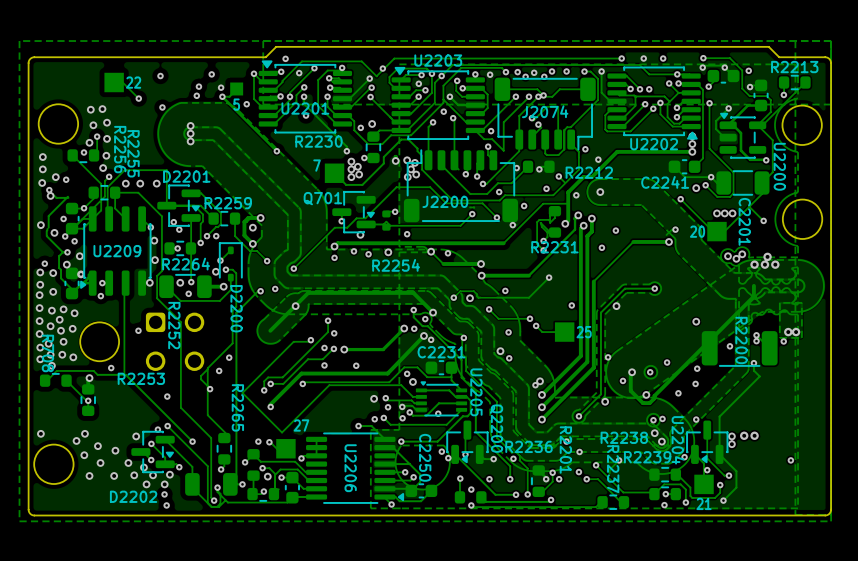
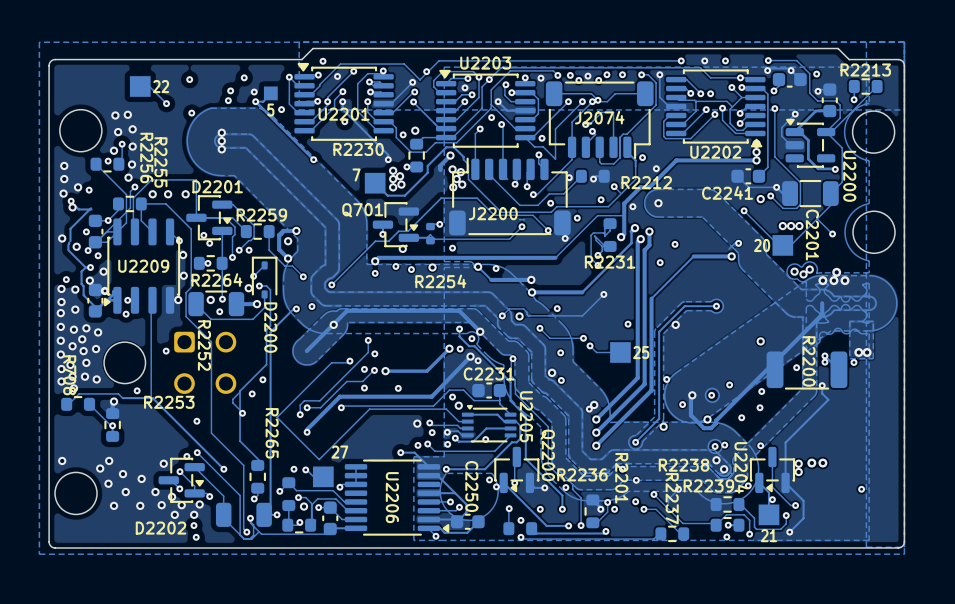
track: none -> (450, 155) (440, 165)
via position: (395, 160) -> (450, 155)

